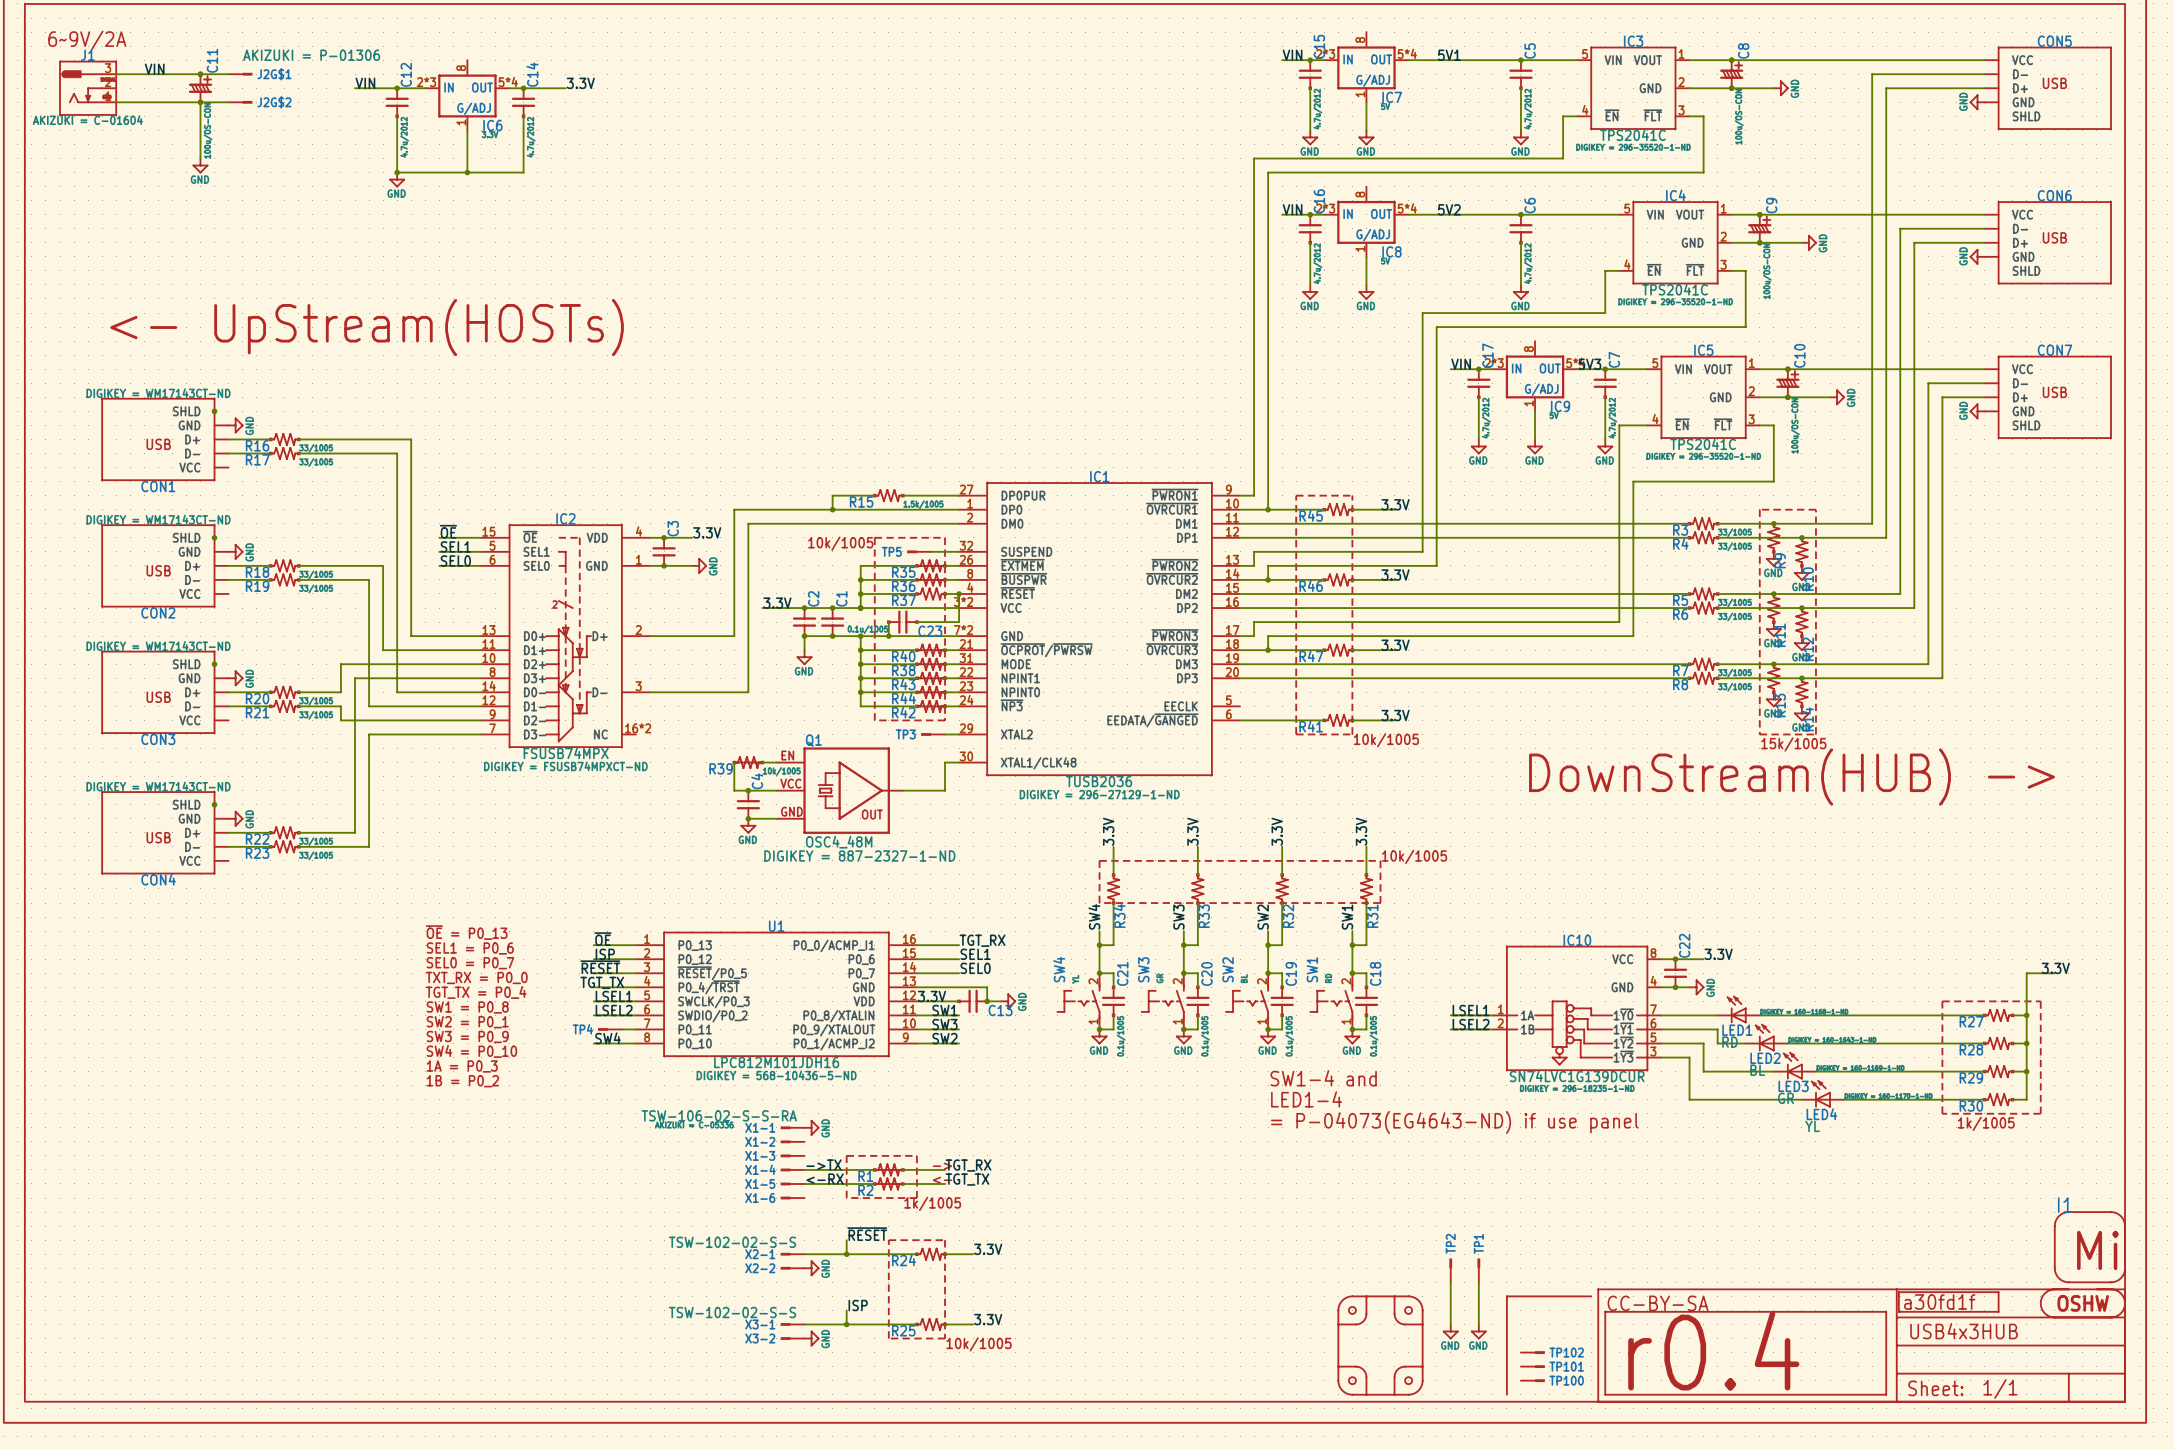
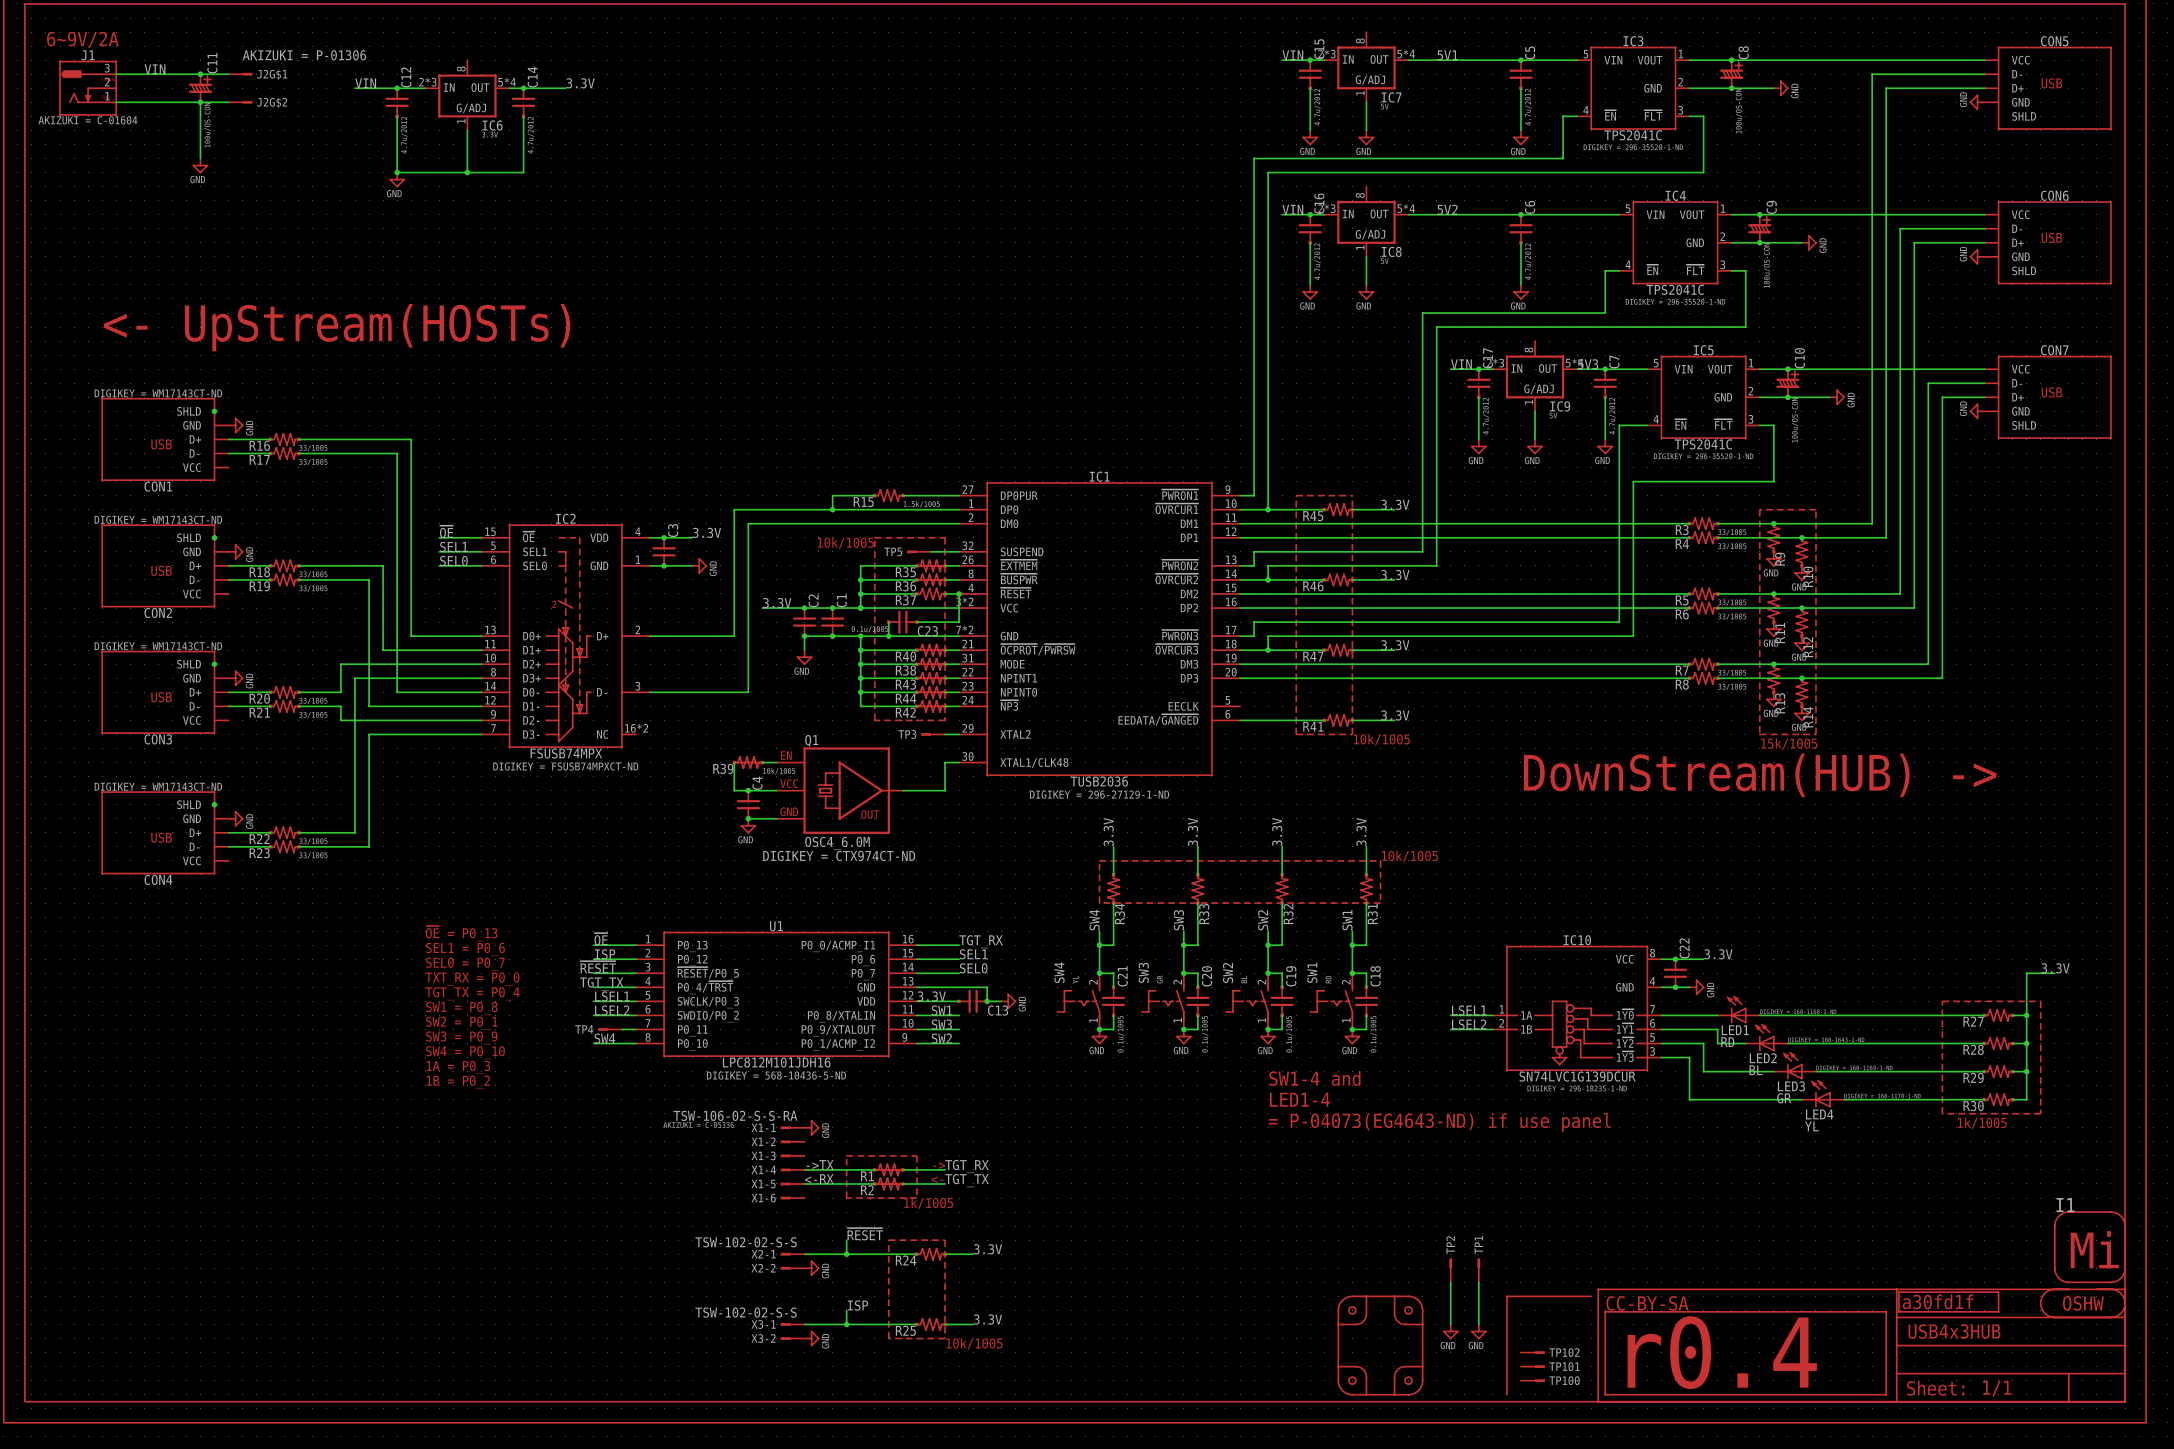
Q1 value: OSC4_48M (839, 842) -> OSC4_6.0M (837, 843)
Q1 text: DIGIKEY = 887-2327-1-ND (859, 855) -> DIGIKEY = CTX974CT-ND (839, 855)

